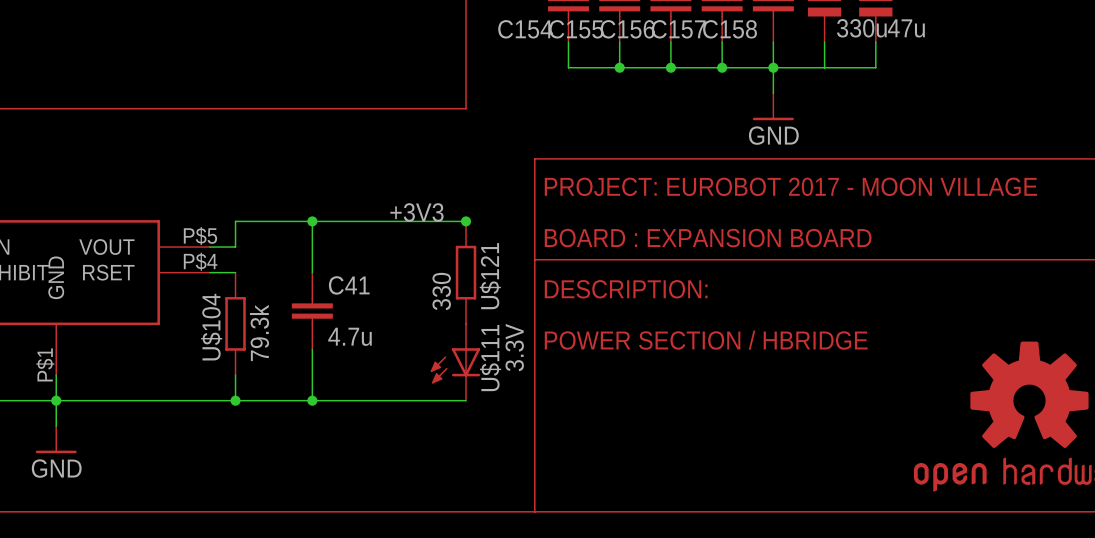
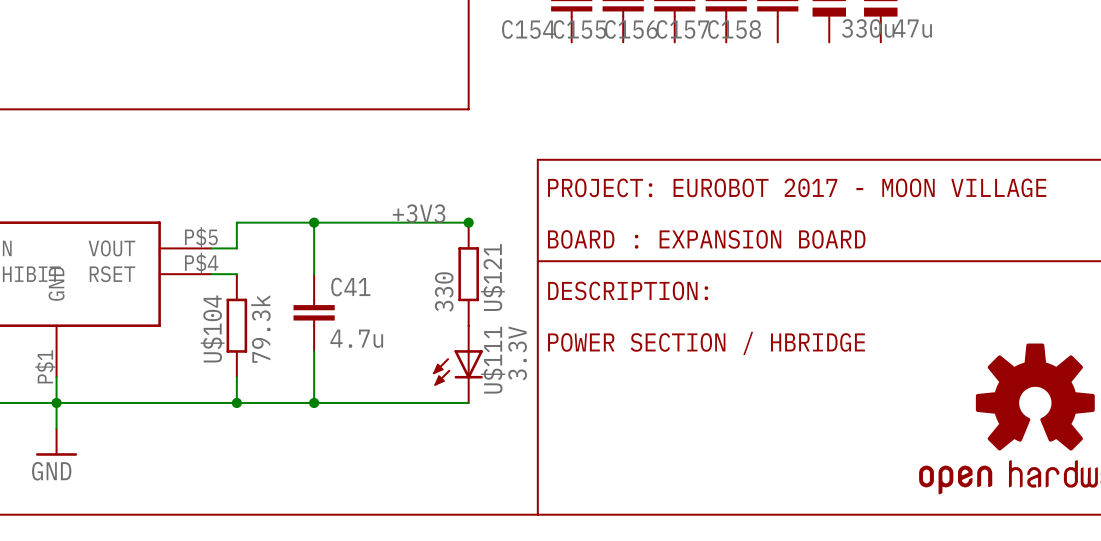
wire: (568, 42) (568, 67) (875, 67) (875, 42) -> none
wire: (619, 42) (619, 67) -> none
wire: (670, 42) (670, 67) -> none
wire: (722, 42) (722, 67) -> none
wire: (773, 42) (773, 93) -> none
wire: (824, 42) (824, 67) -> none
junction: (619, 67) -> none
junction: (670, 67) -> none
junction: (722, 67) -> none
junction: (773, 67) -> none
power symbol: GND (773, 106) -> none

